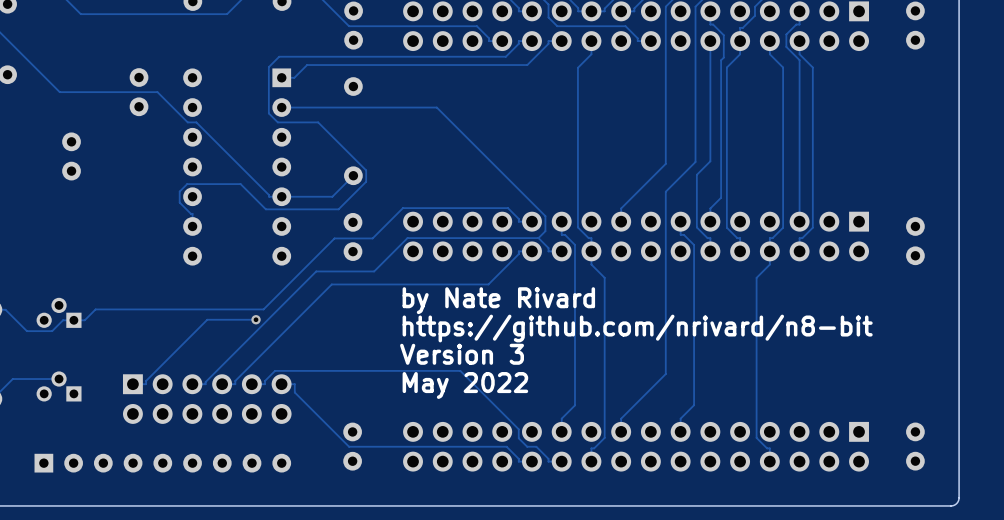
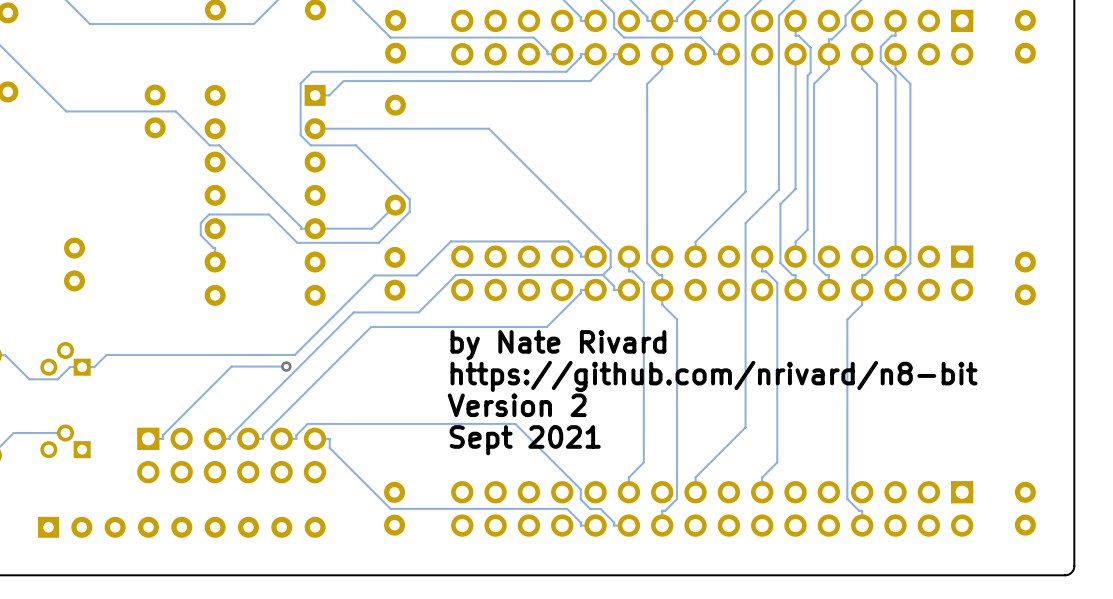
part position: (71, 156) -> (74, 264)
text: Version 3 (462, 354) -> Version 2 (517, 405)
text: May 2022 (465, 385) -> Sept 2021 (525, 440)

